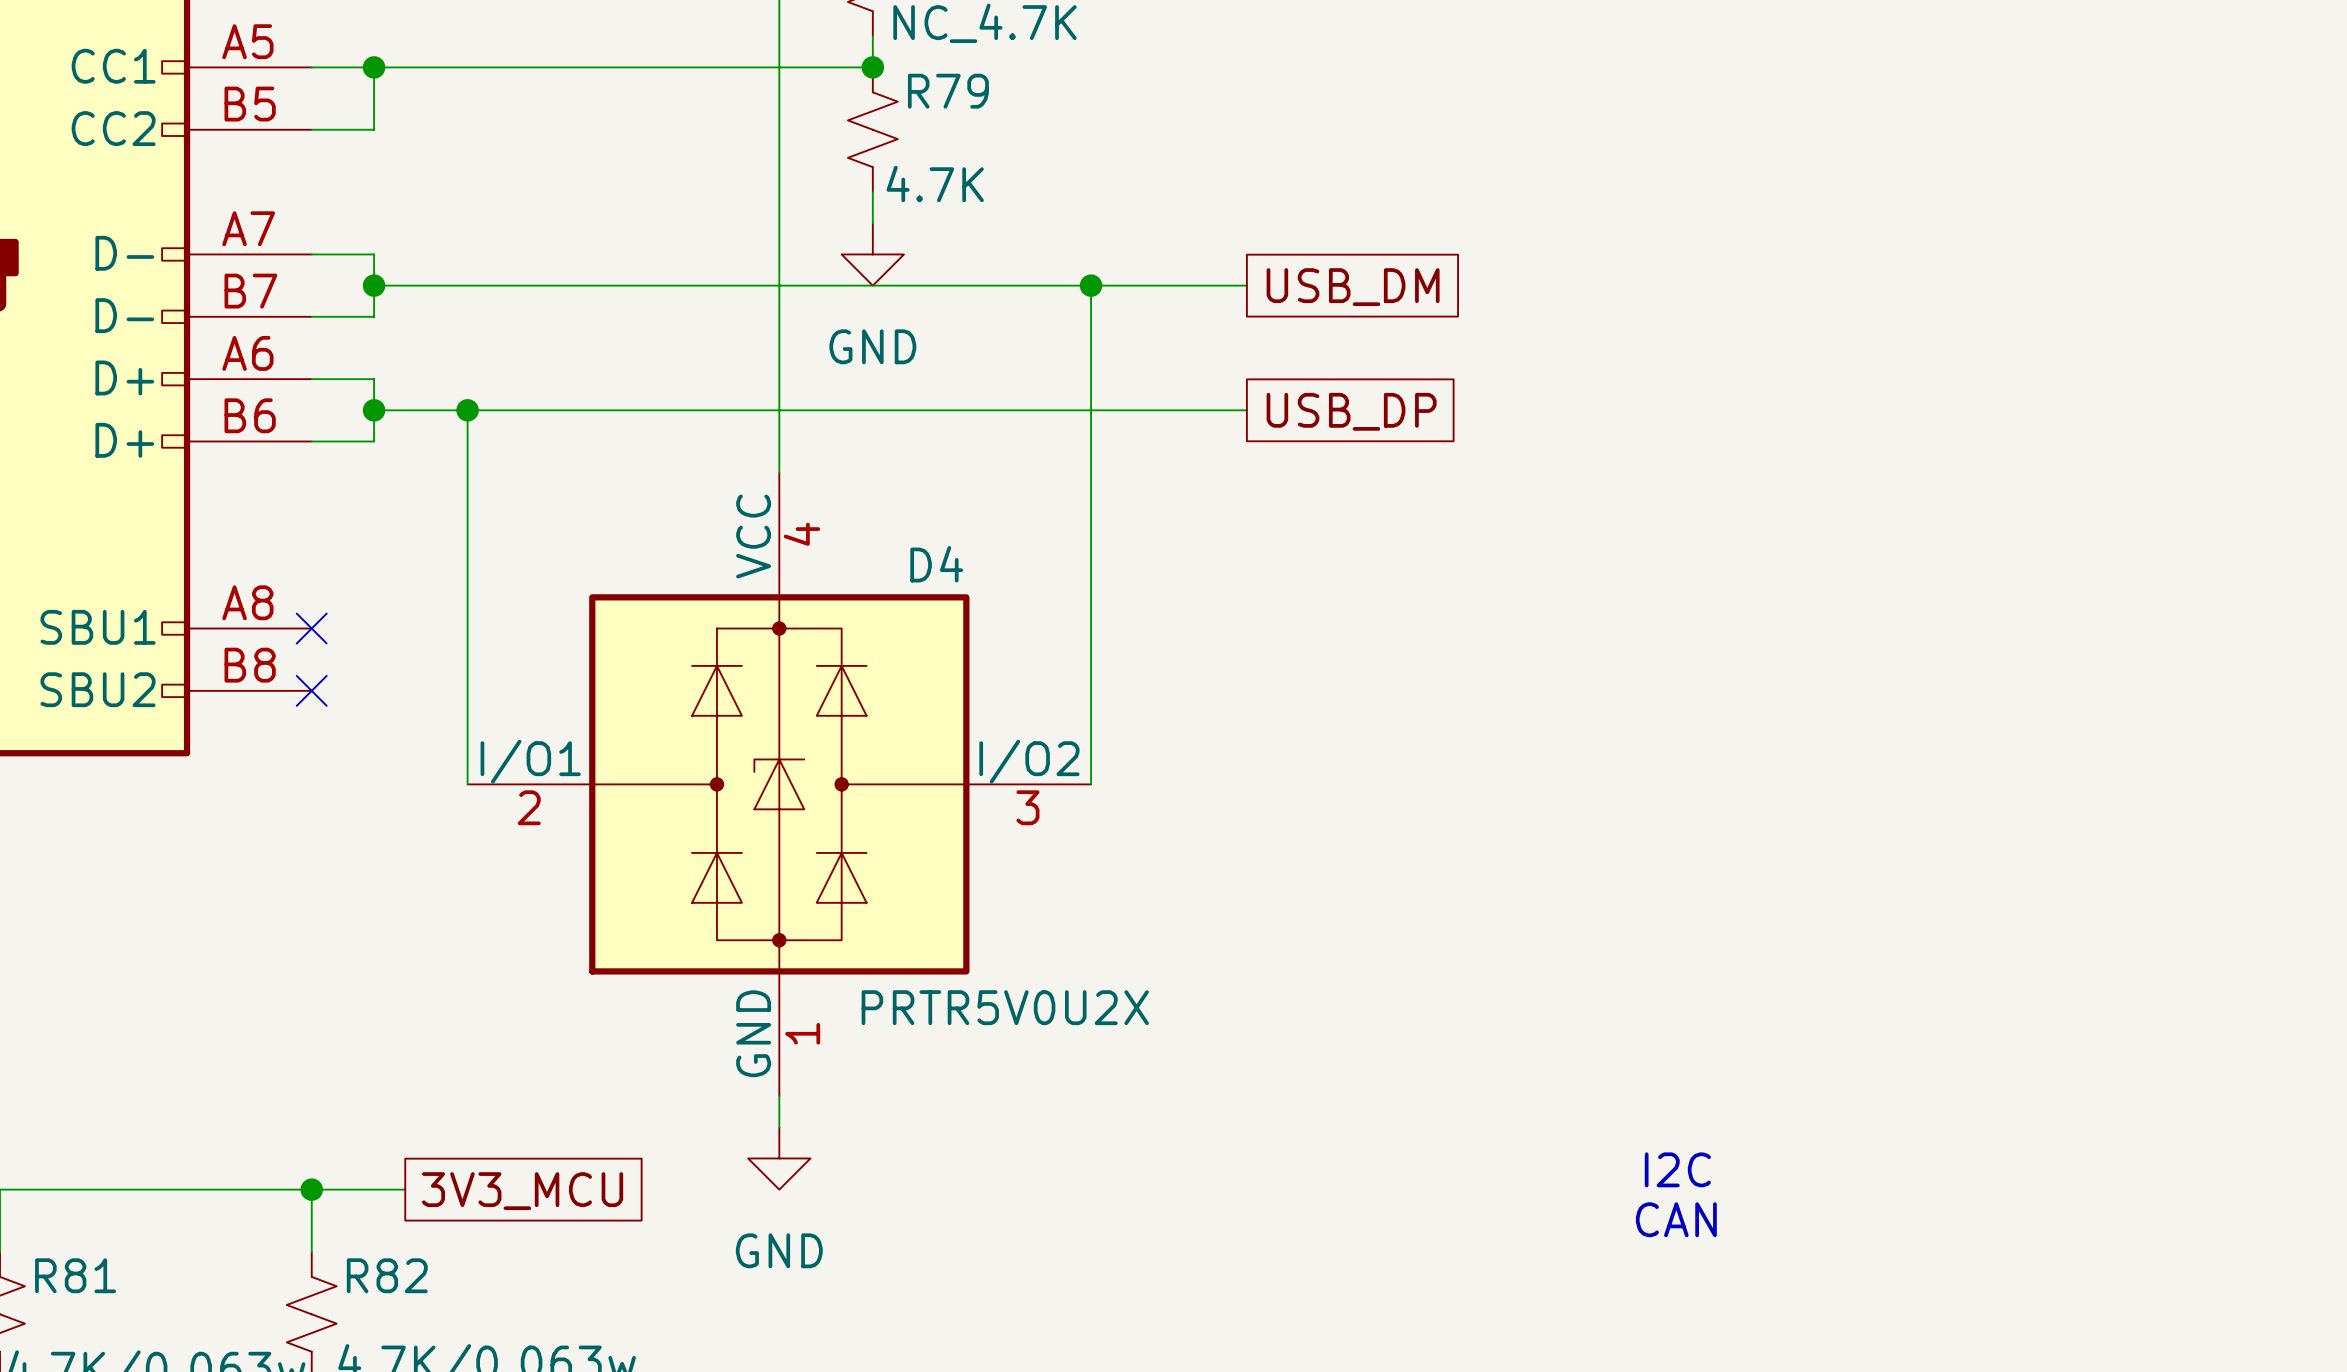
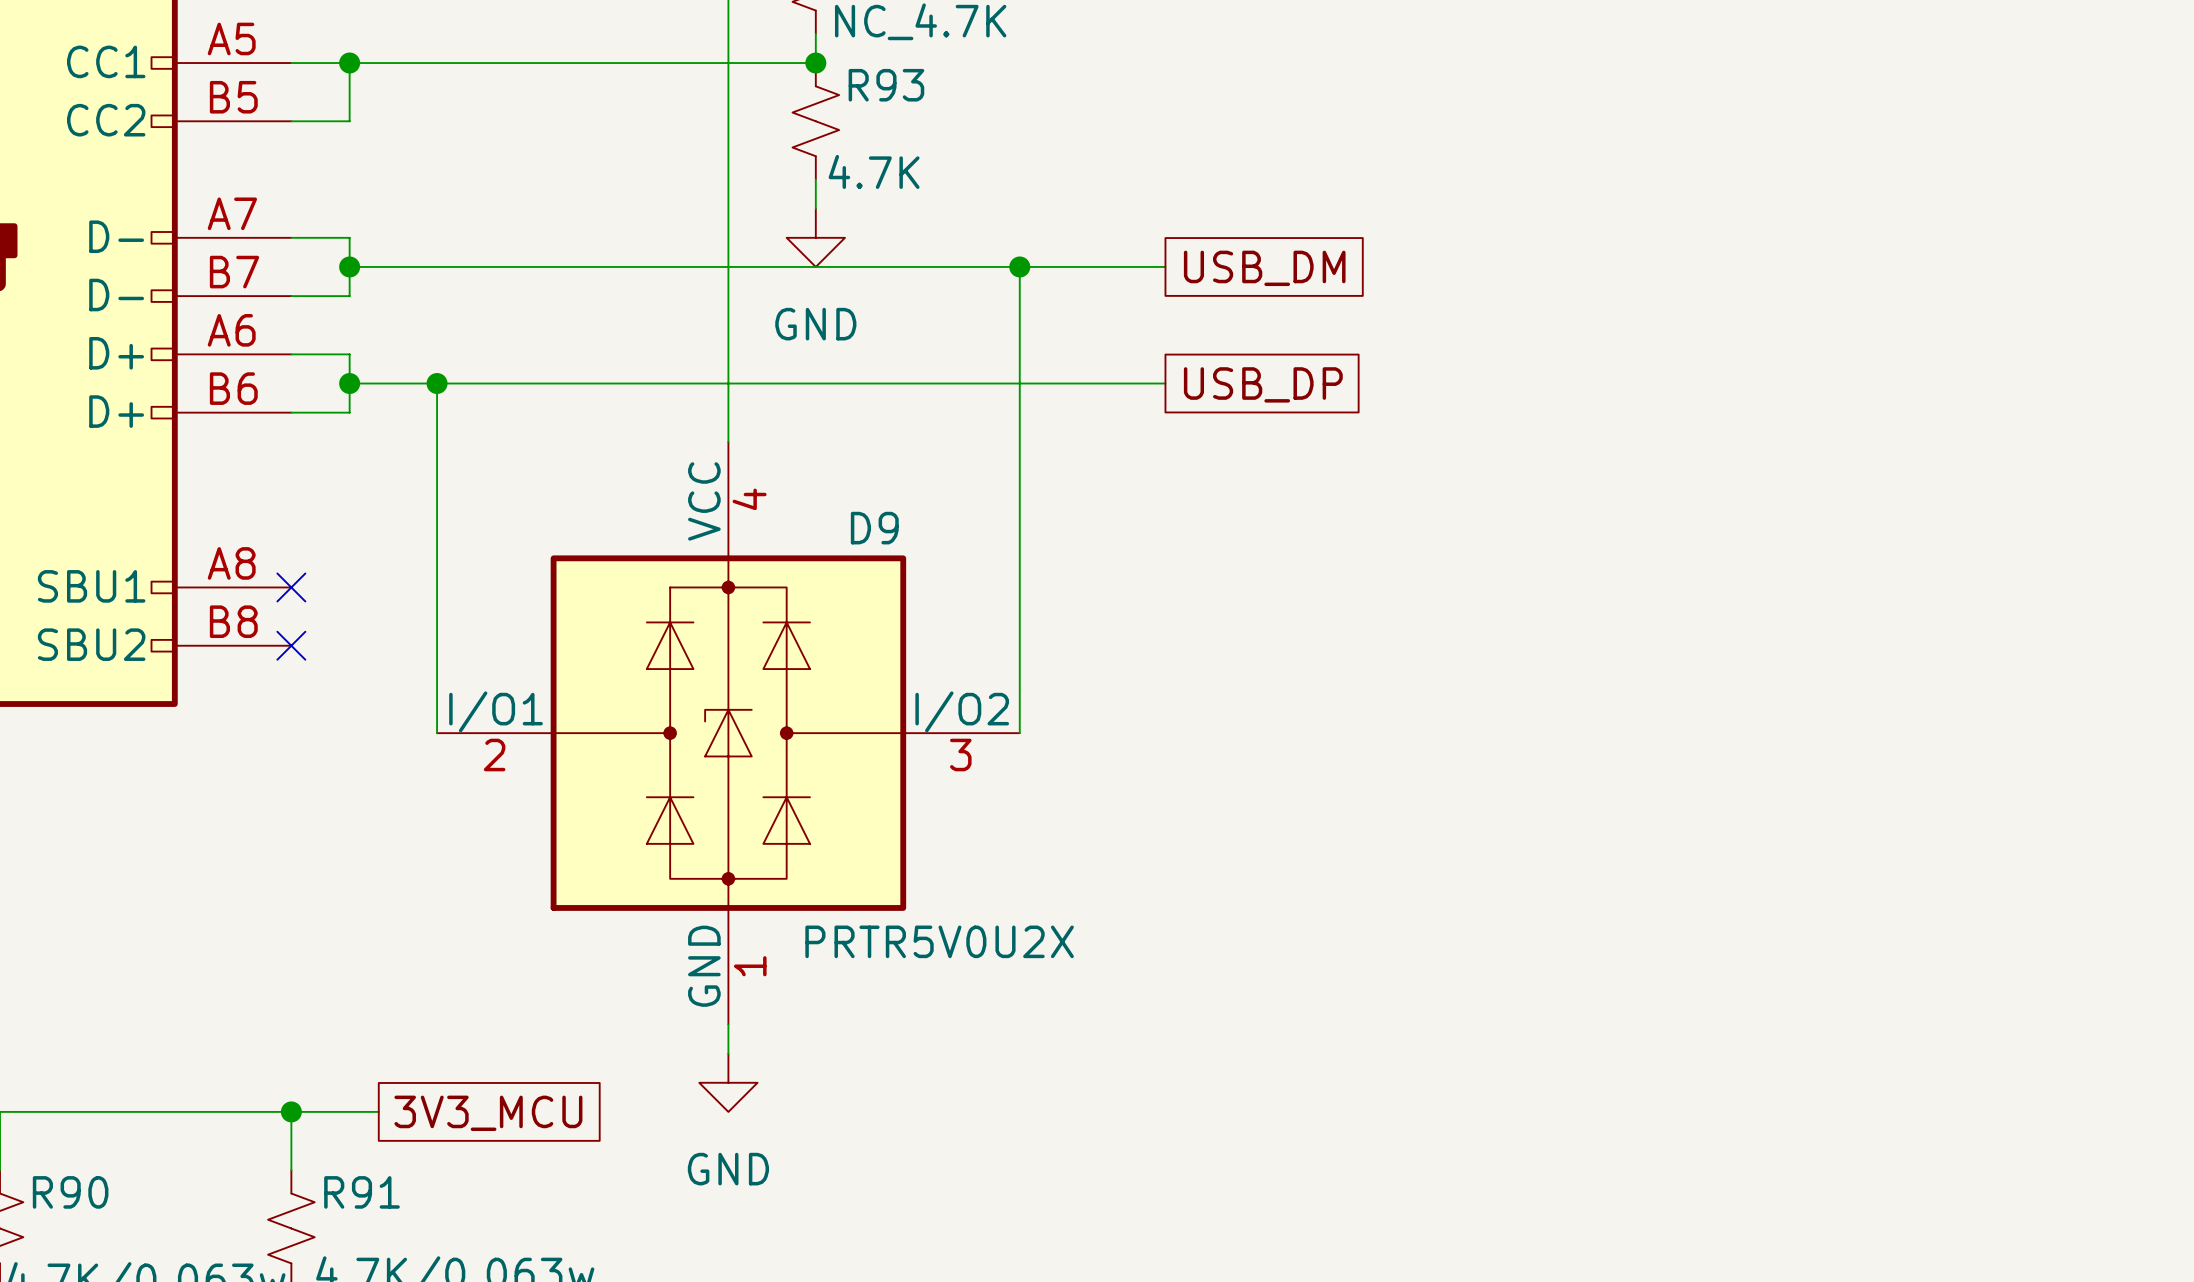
R79 name: R79 (948, 91) -> R93 (886, 85)
D4 name: D4 (936, 564) -> D9 (874, 528)
text: I2C (1677, 1169) -> none
text: CAN (1676, 1219) -> none
R81 name: R81 (75, 1275) -> R90 (70, 1192)
R82 name: R82 (387, 1275) -> R91 (361, 1192)

